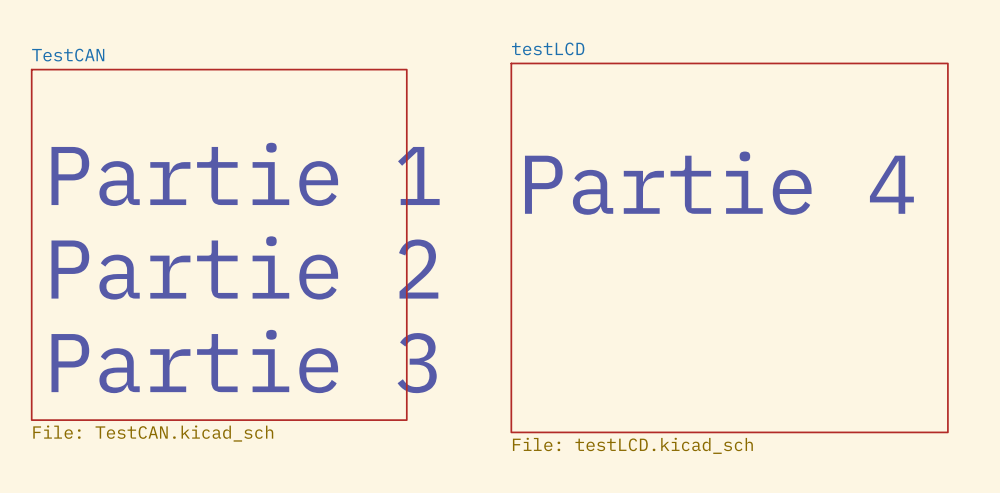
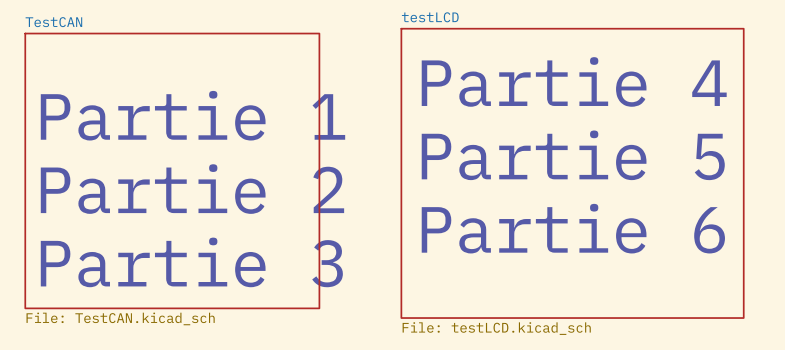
text position: Partie 4 (719, 183) -> Partie 4 (574, 81)
text: none -> Partie 5 (573, 155)
text: none -> Partie 6 (573, 228)

